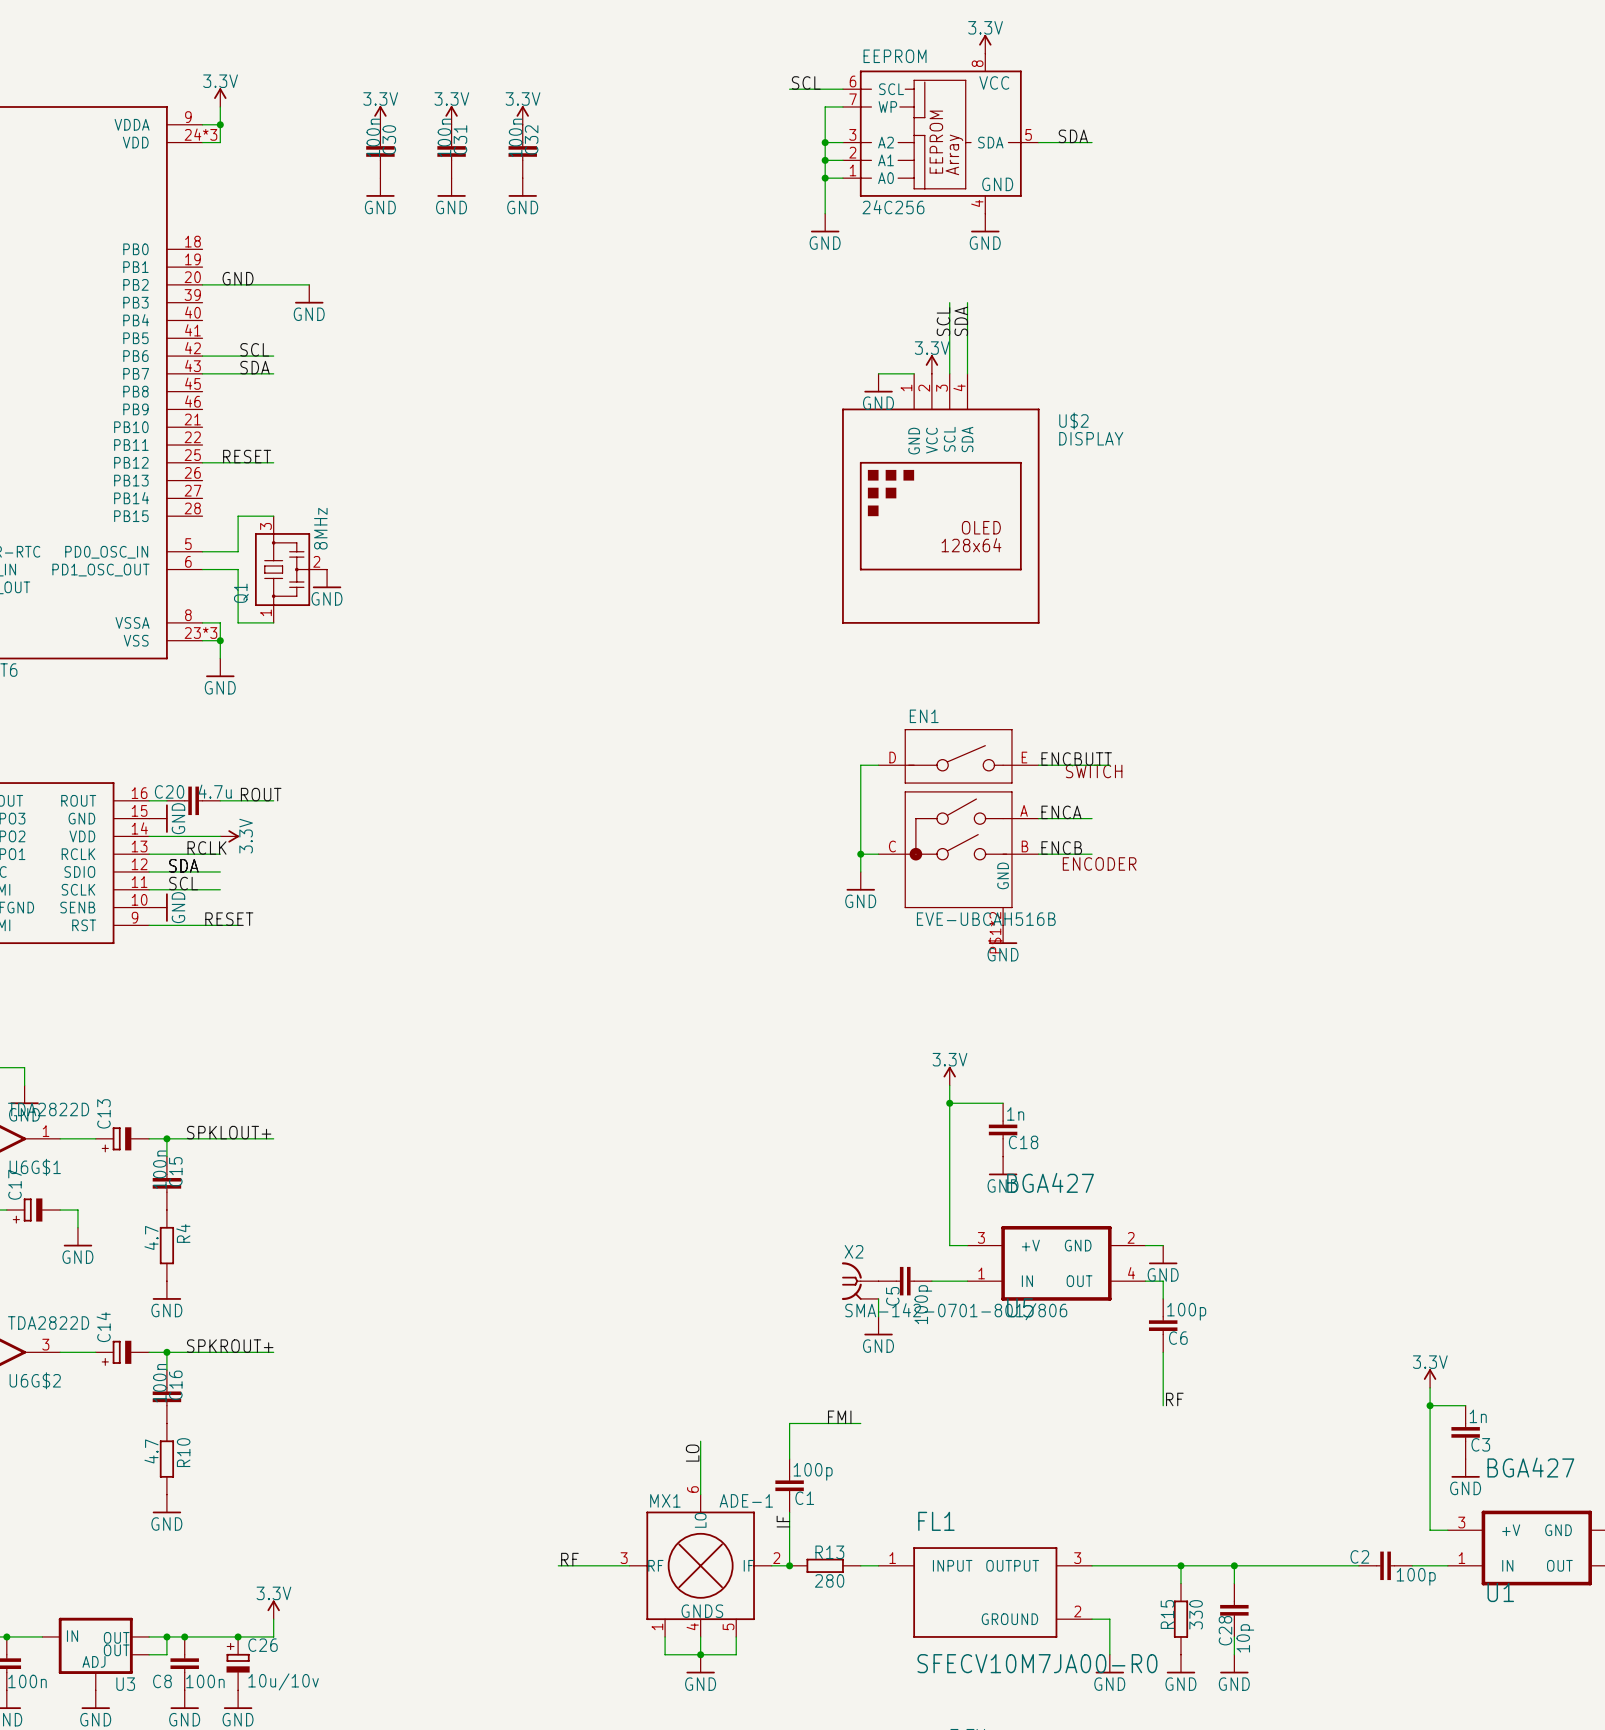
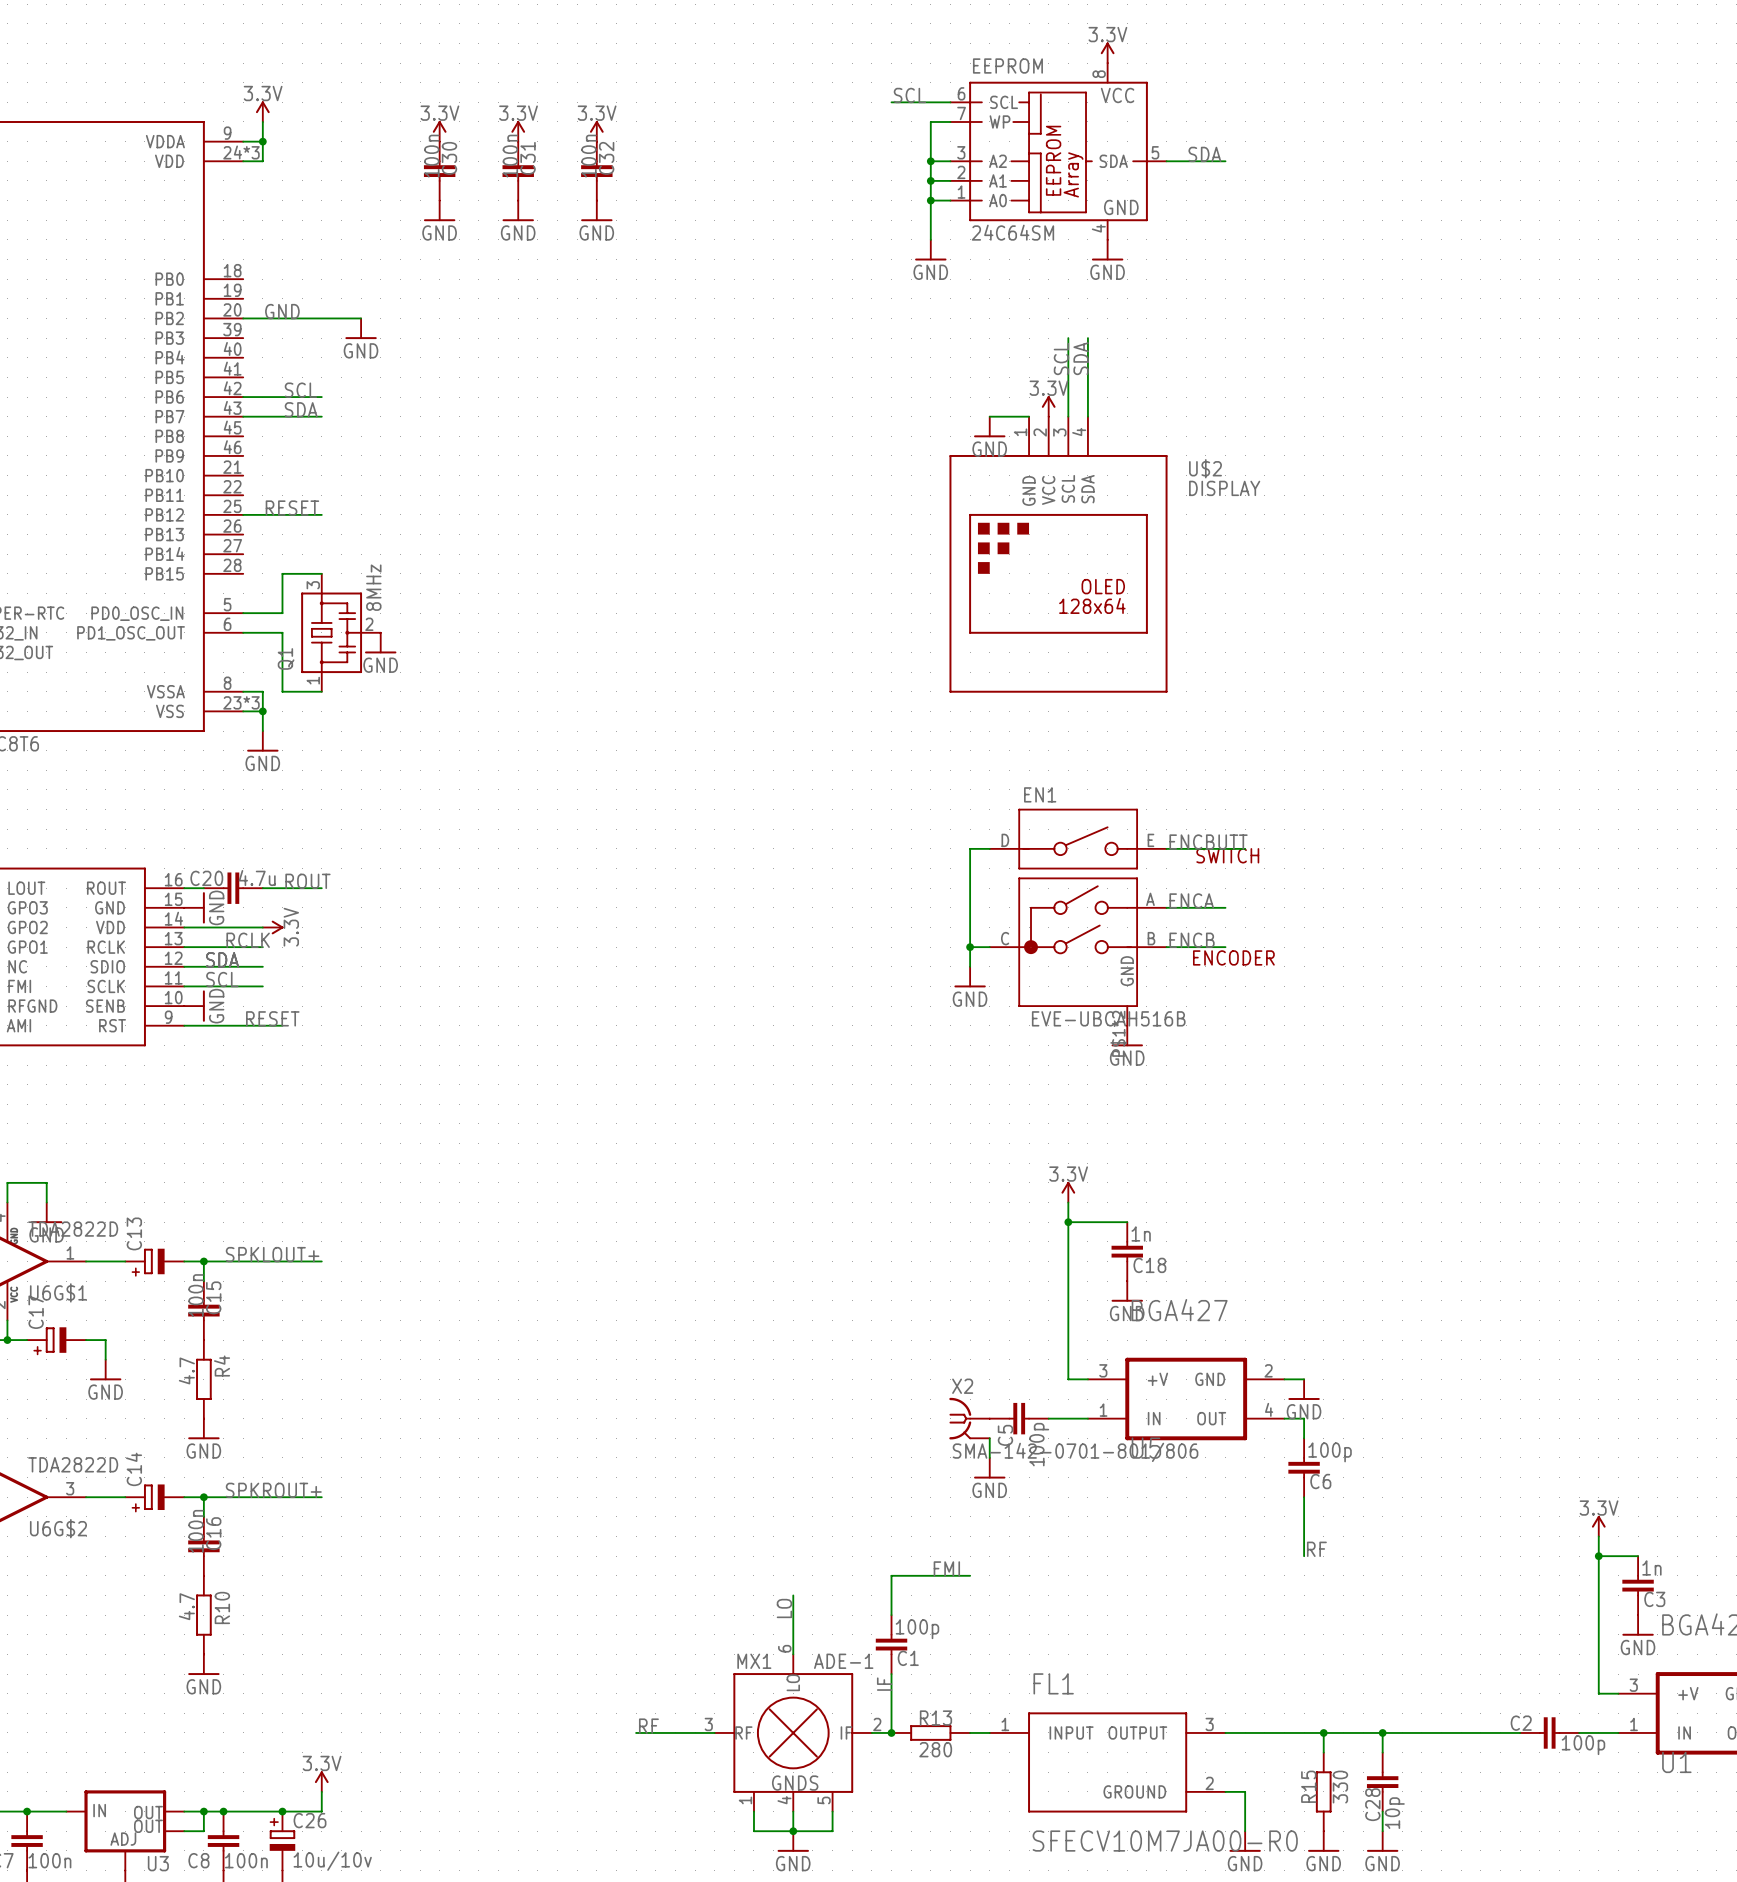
EEPROM value: 24C256 (893, 207) -> 24C64SM (1012, 232)

